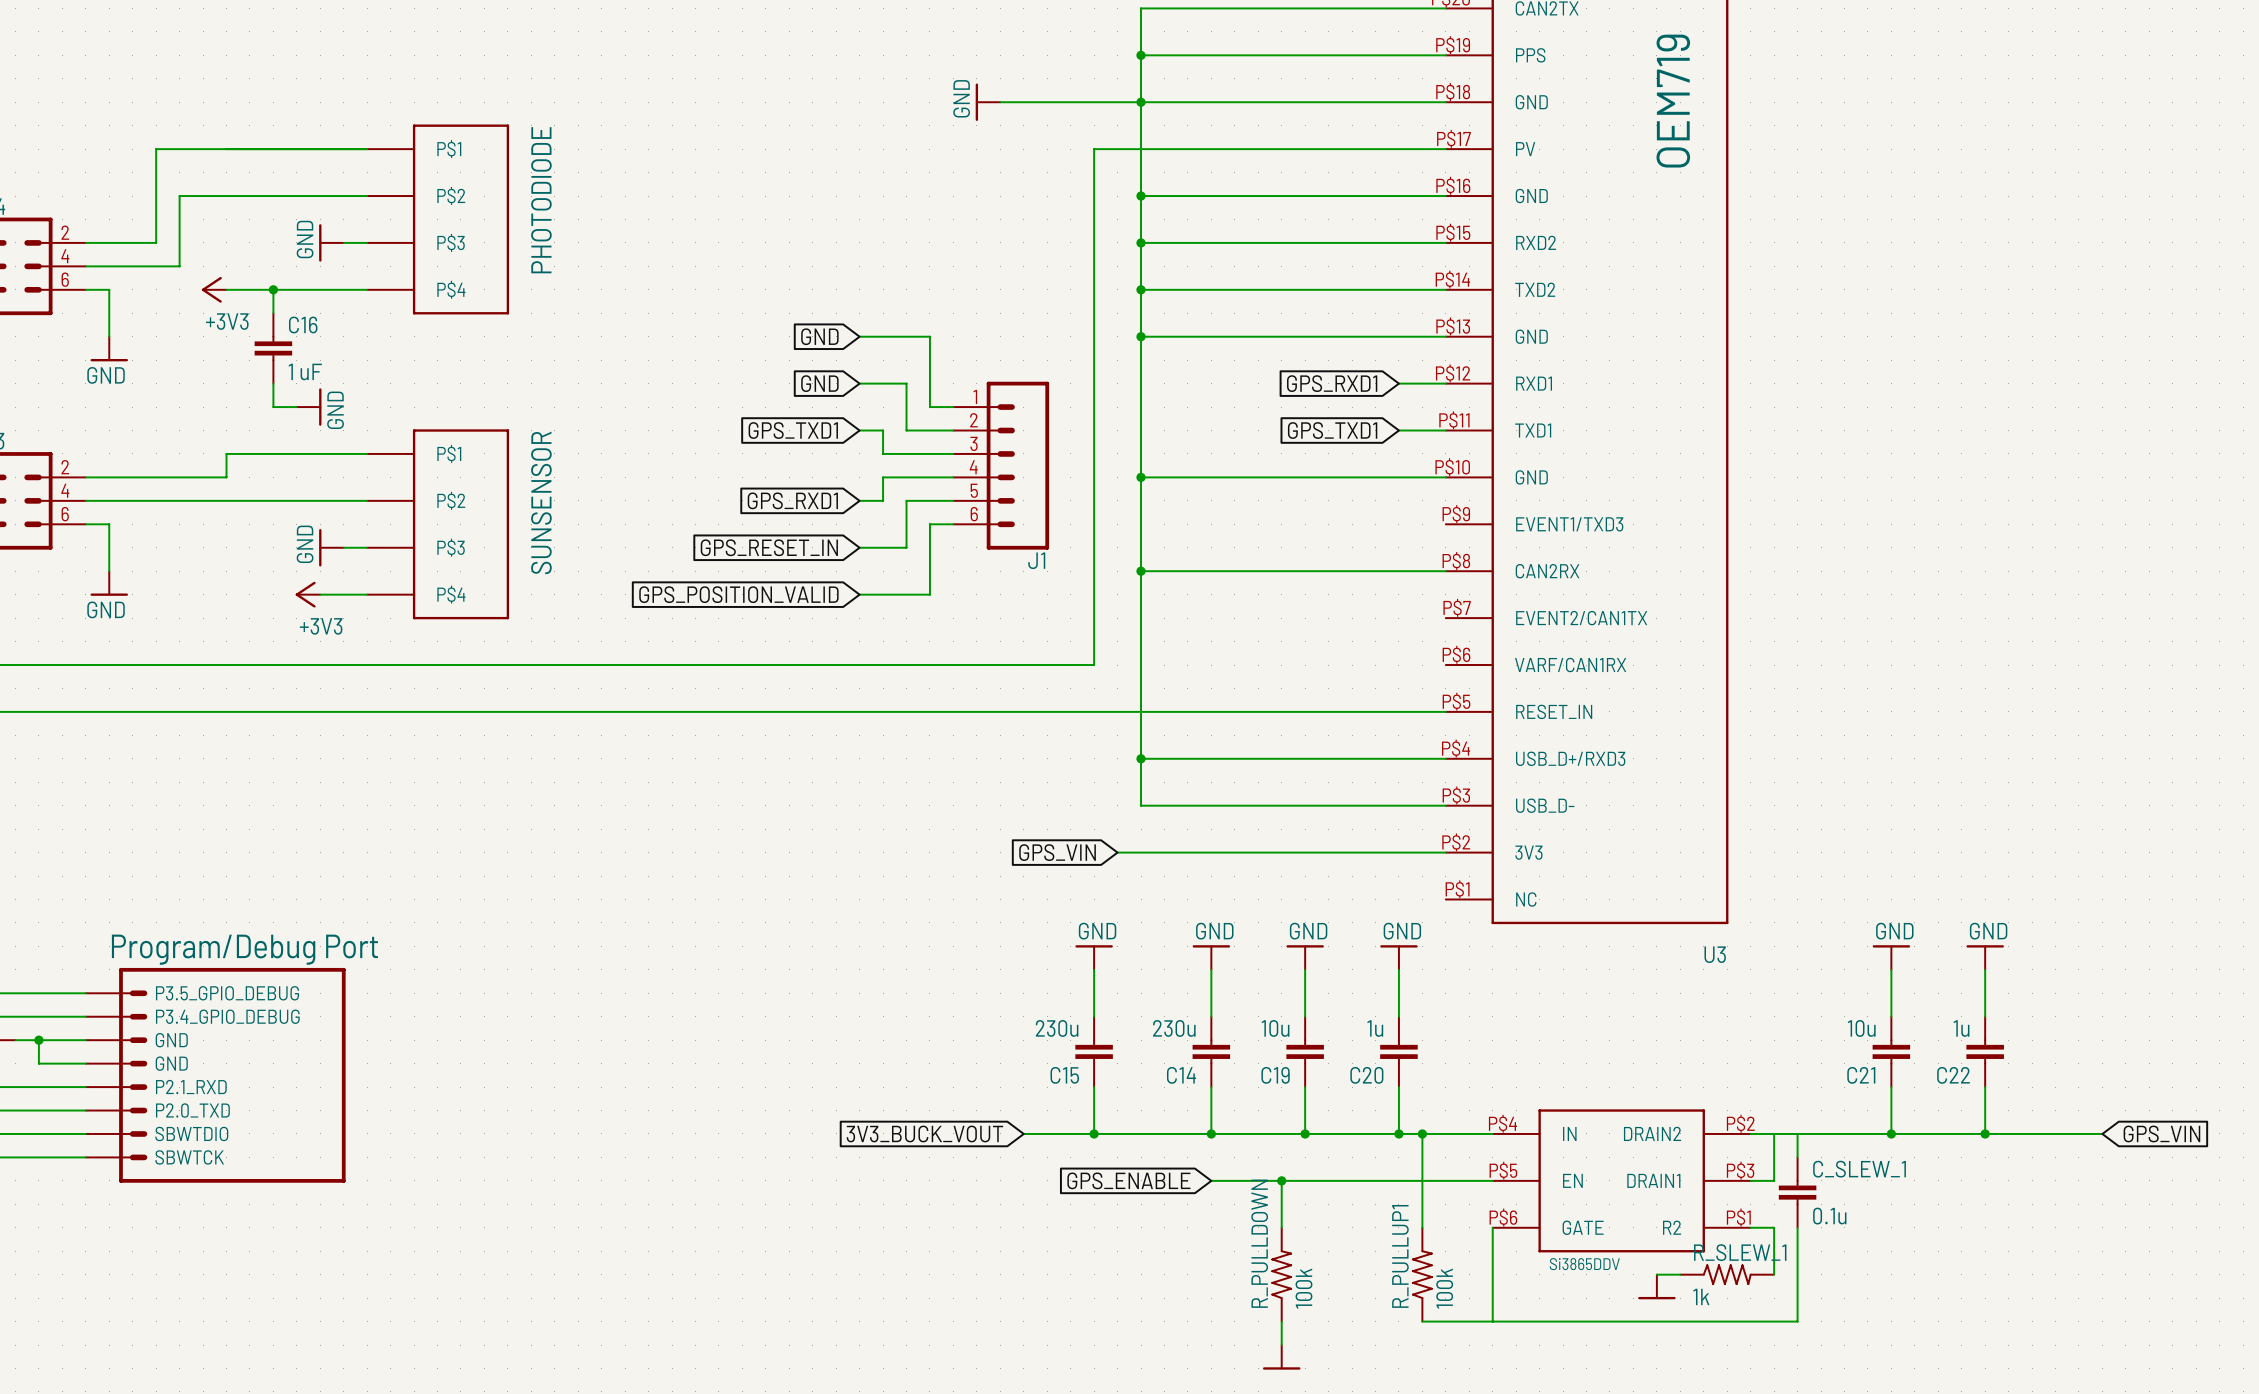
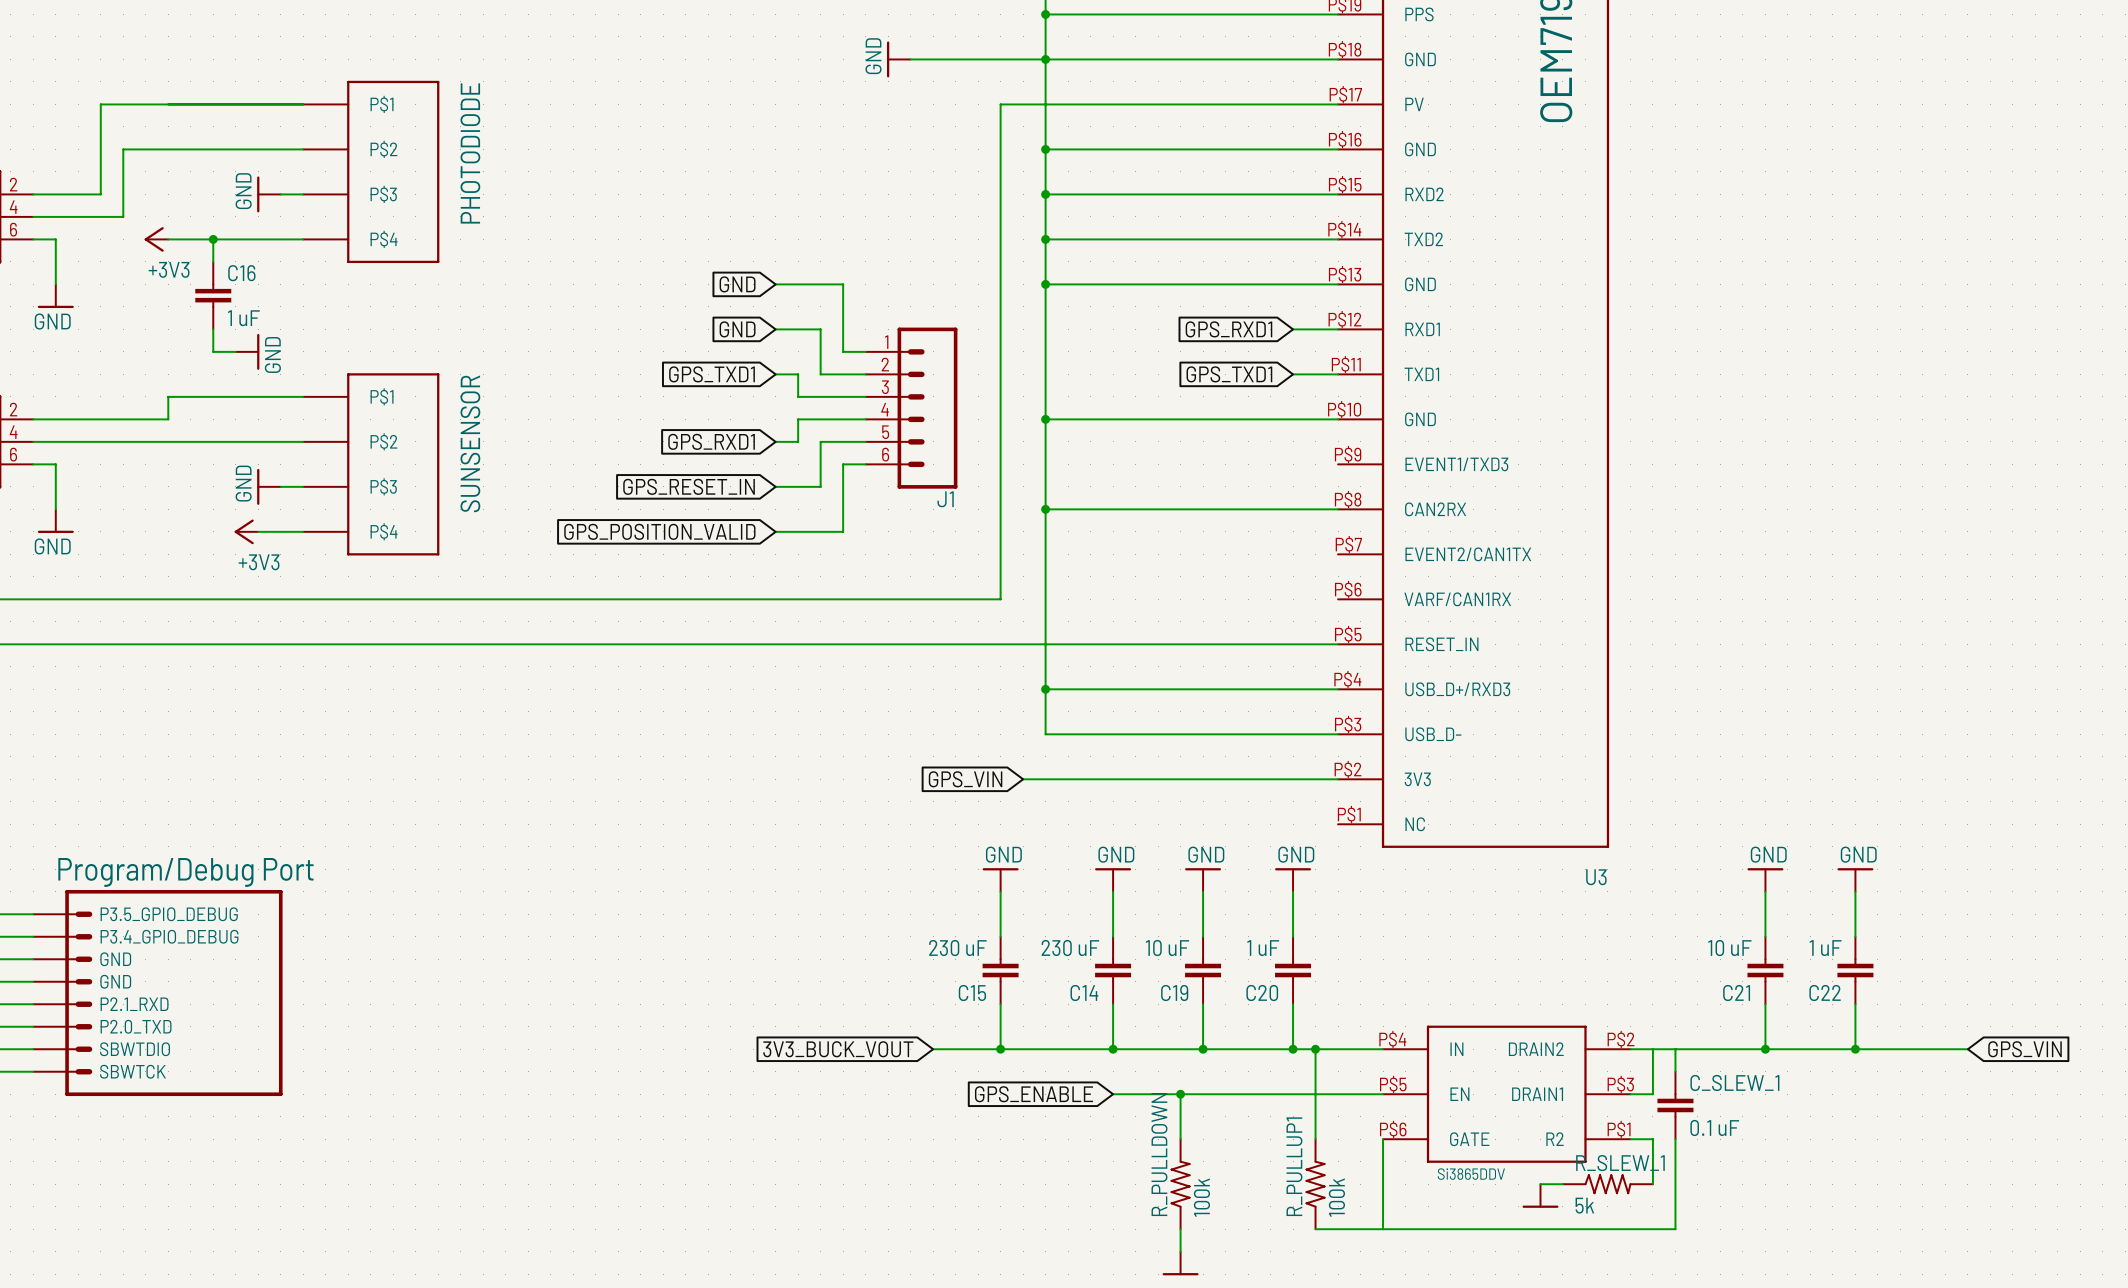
C15 value: 230u (1057, 1028) -> 230 uF (957, 948)
C14 value: 230u (1174, 1028) -> 230 uF (1070, 948)
C19 value: 10u (1275, 1028) -> 10 uF (1167, 948)
C20 value: 1u (1375, 1028) -> 1 uF (1263, 948)
C21 value: 10u (1861, 1028) -> 10 uF (1729, 948)
C22 value: 1u (1961, 1028) -> 1 uF (1825, 948)
C_SLEW_1 value: 0.1u (1829, 1216) -> 0.1 uF (1714, 1127)
R_SLEW_1 value: 1k (1701, 1296) -> 5k (1584, 1205)

